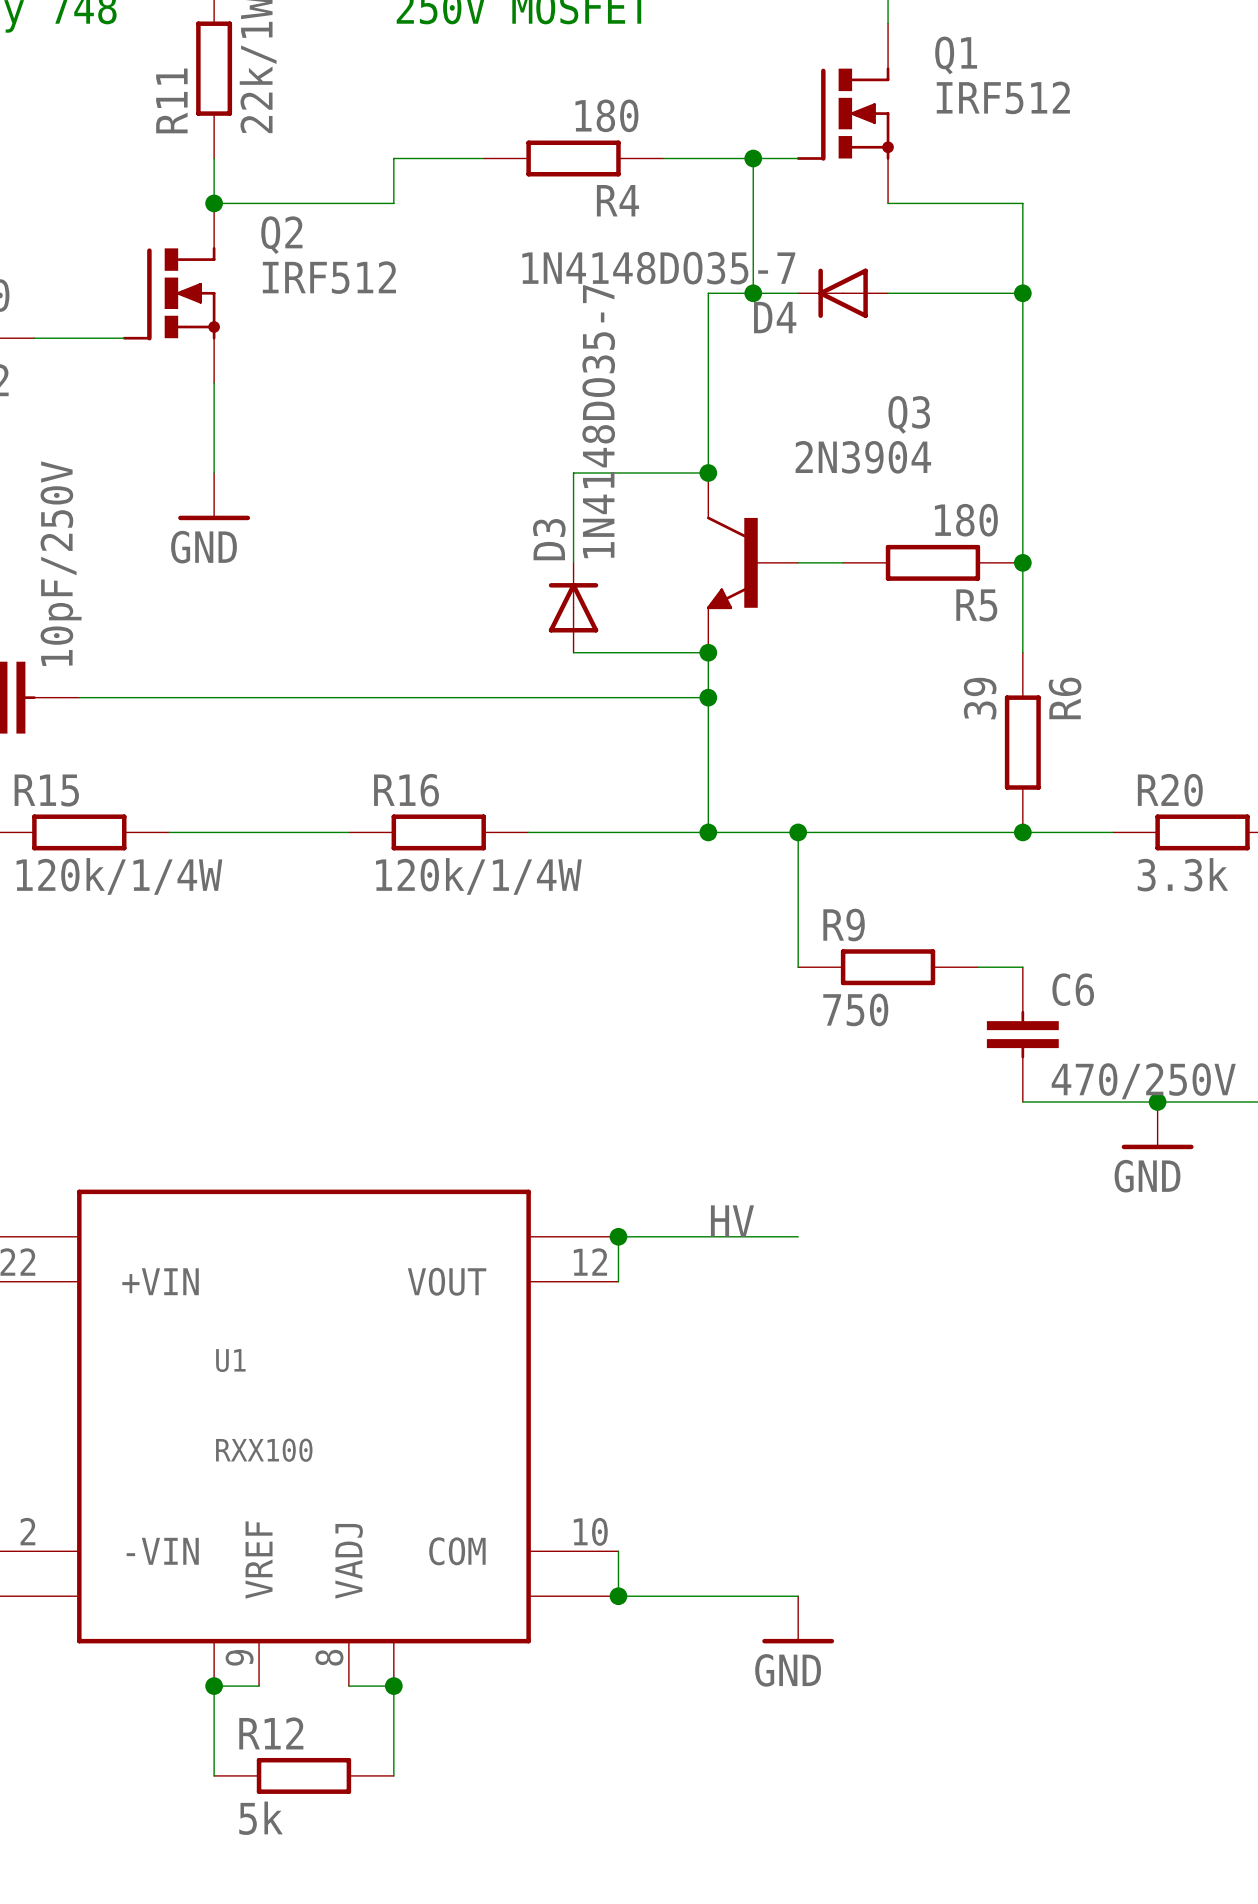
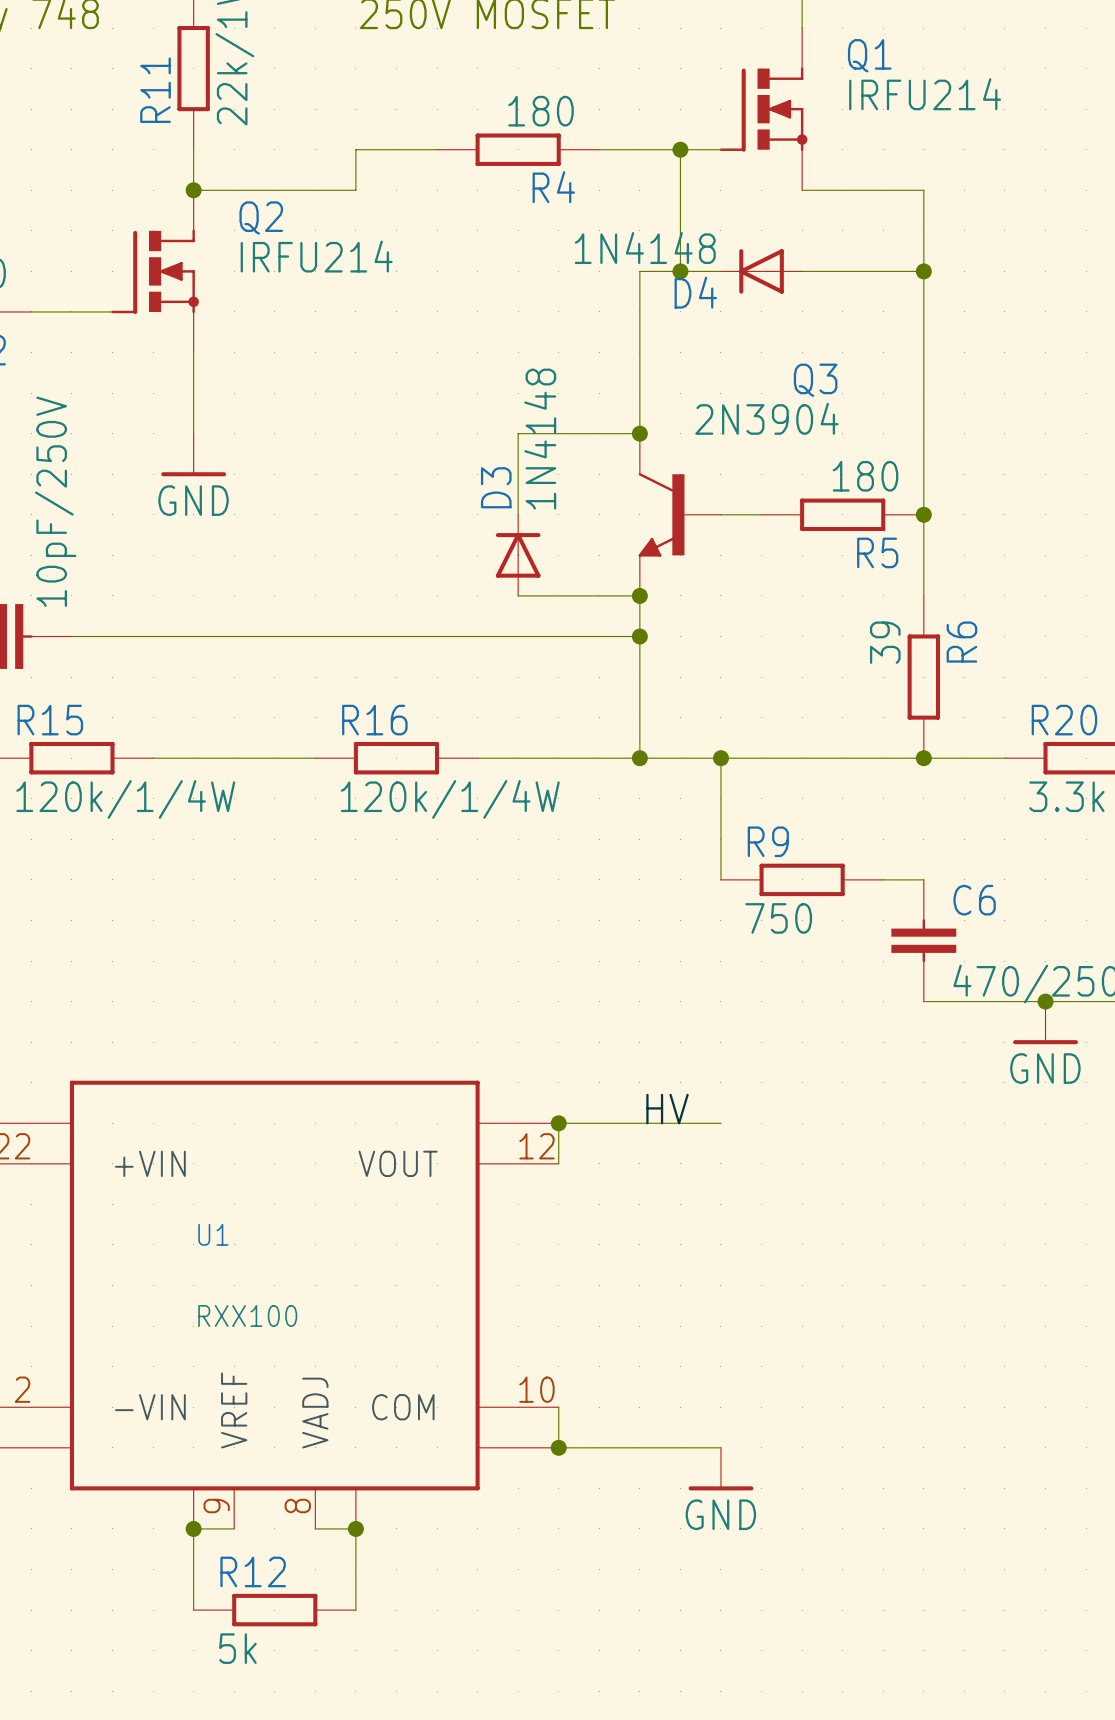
Q1 value: IRF512 (1003, 97) -> IRFU214 (925, 94)
D4 value: 1N4148DO35-7 (658, 268) -> 1N4148 (645, 248)
Q2 value: IRF512 (329, 277) -> IRFU214 (316, 256)
D3 value: 1N4148DO35-7 (598, 421) -> 1N4148 (540, 439)

